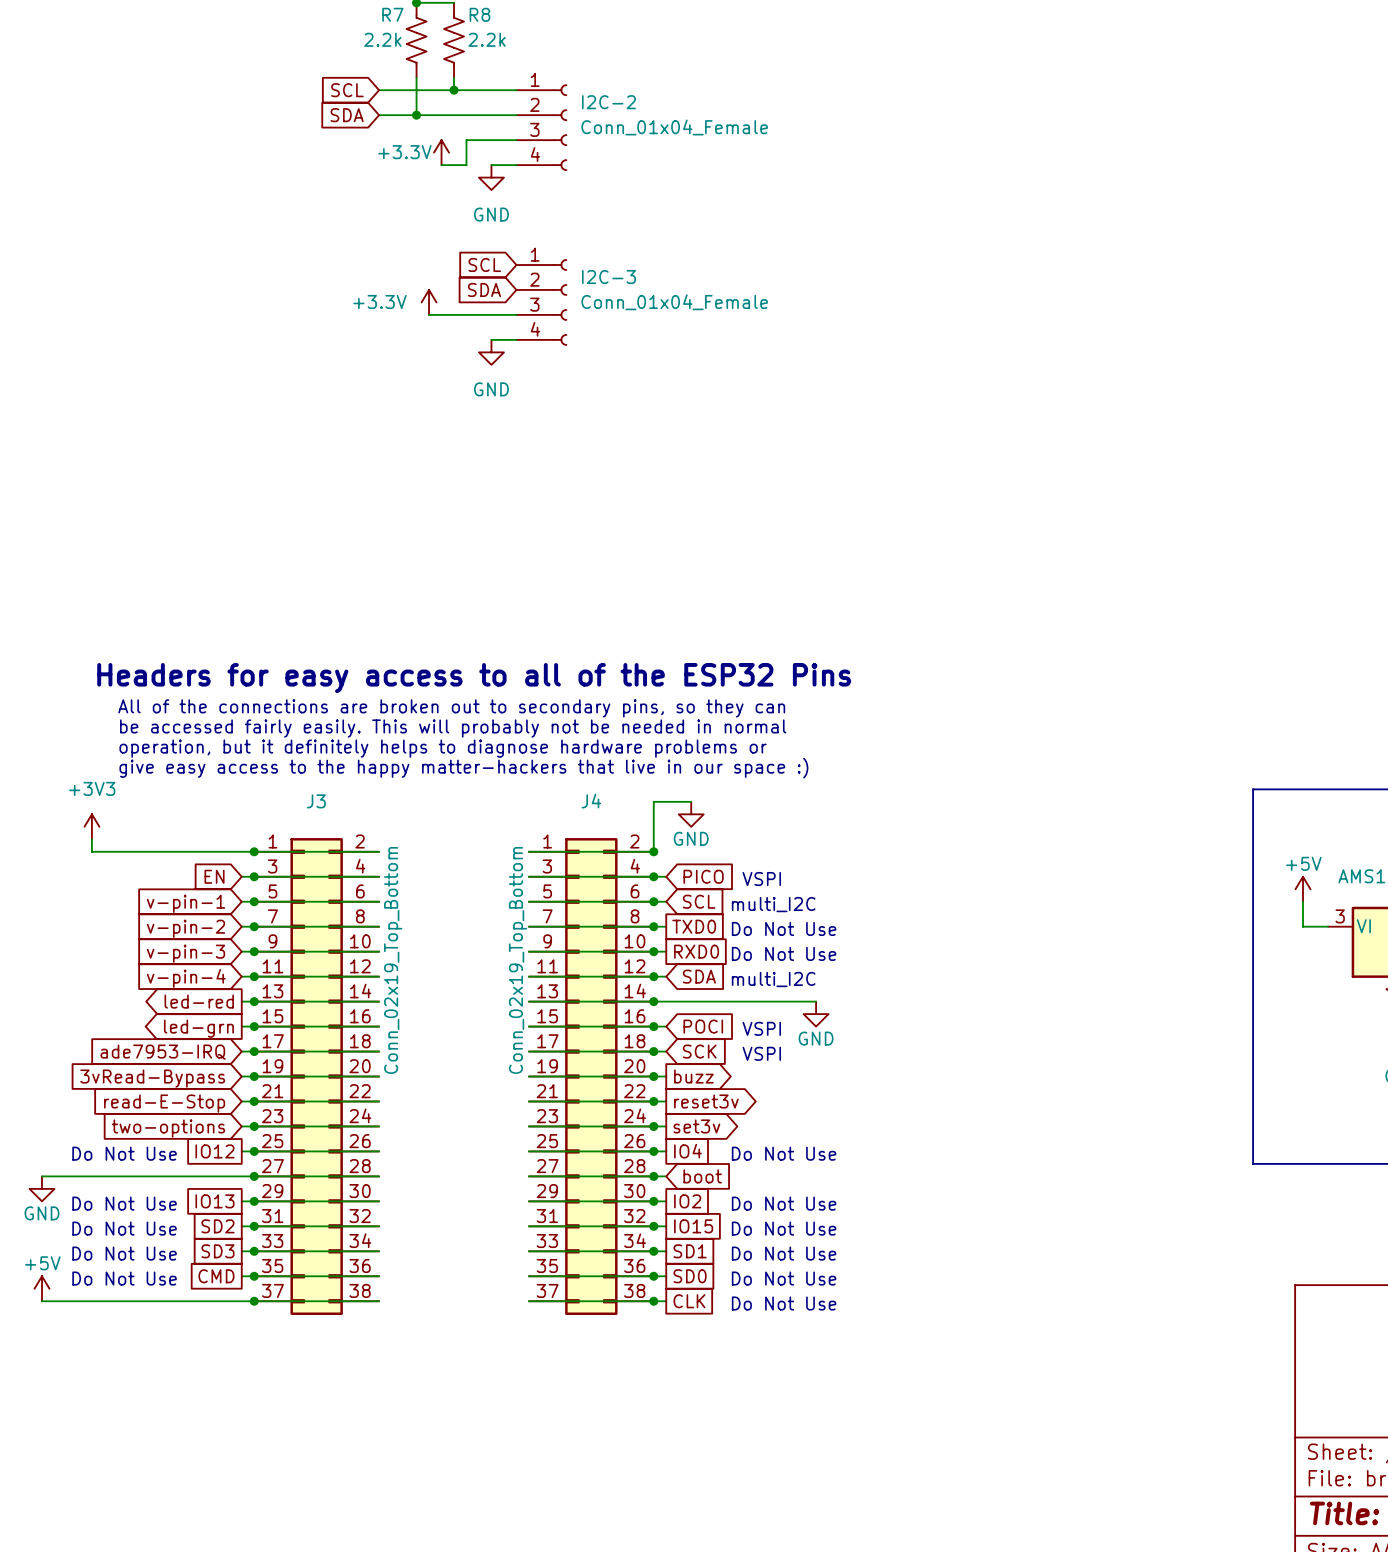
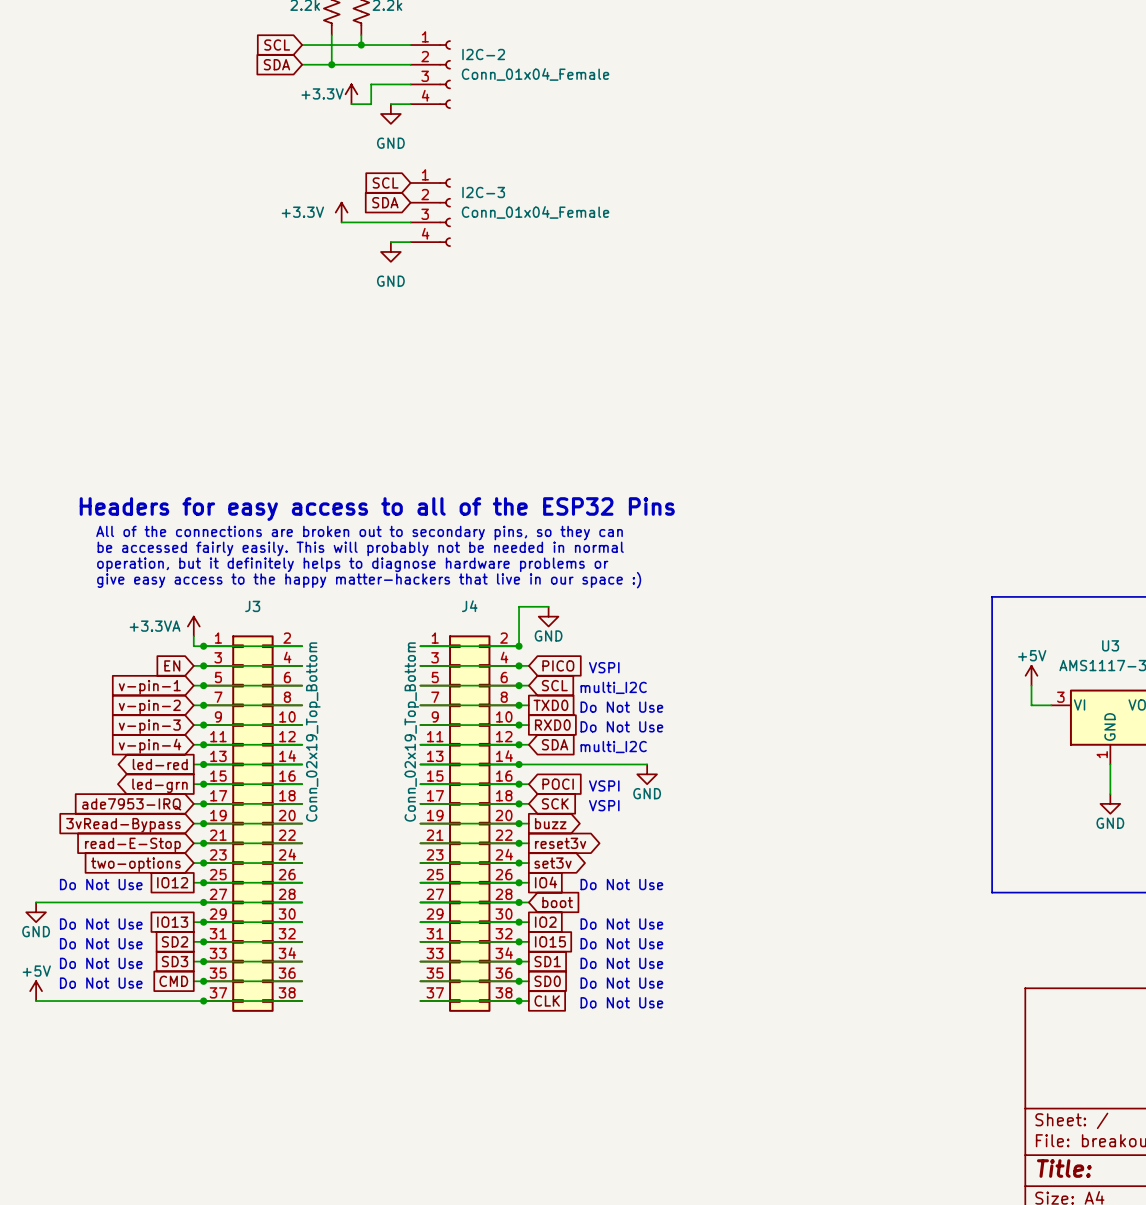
power symbol: +3V3 (91, 826) -> none
power symbol: none -> +3.3VA (193, 626)
wire: (91, 839) (91, 851) (241, 851) -> (193, 636) (193, 646)

